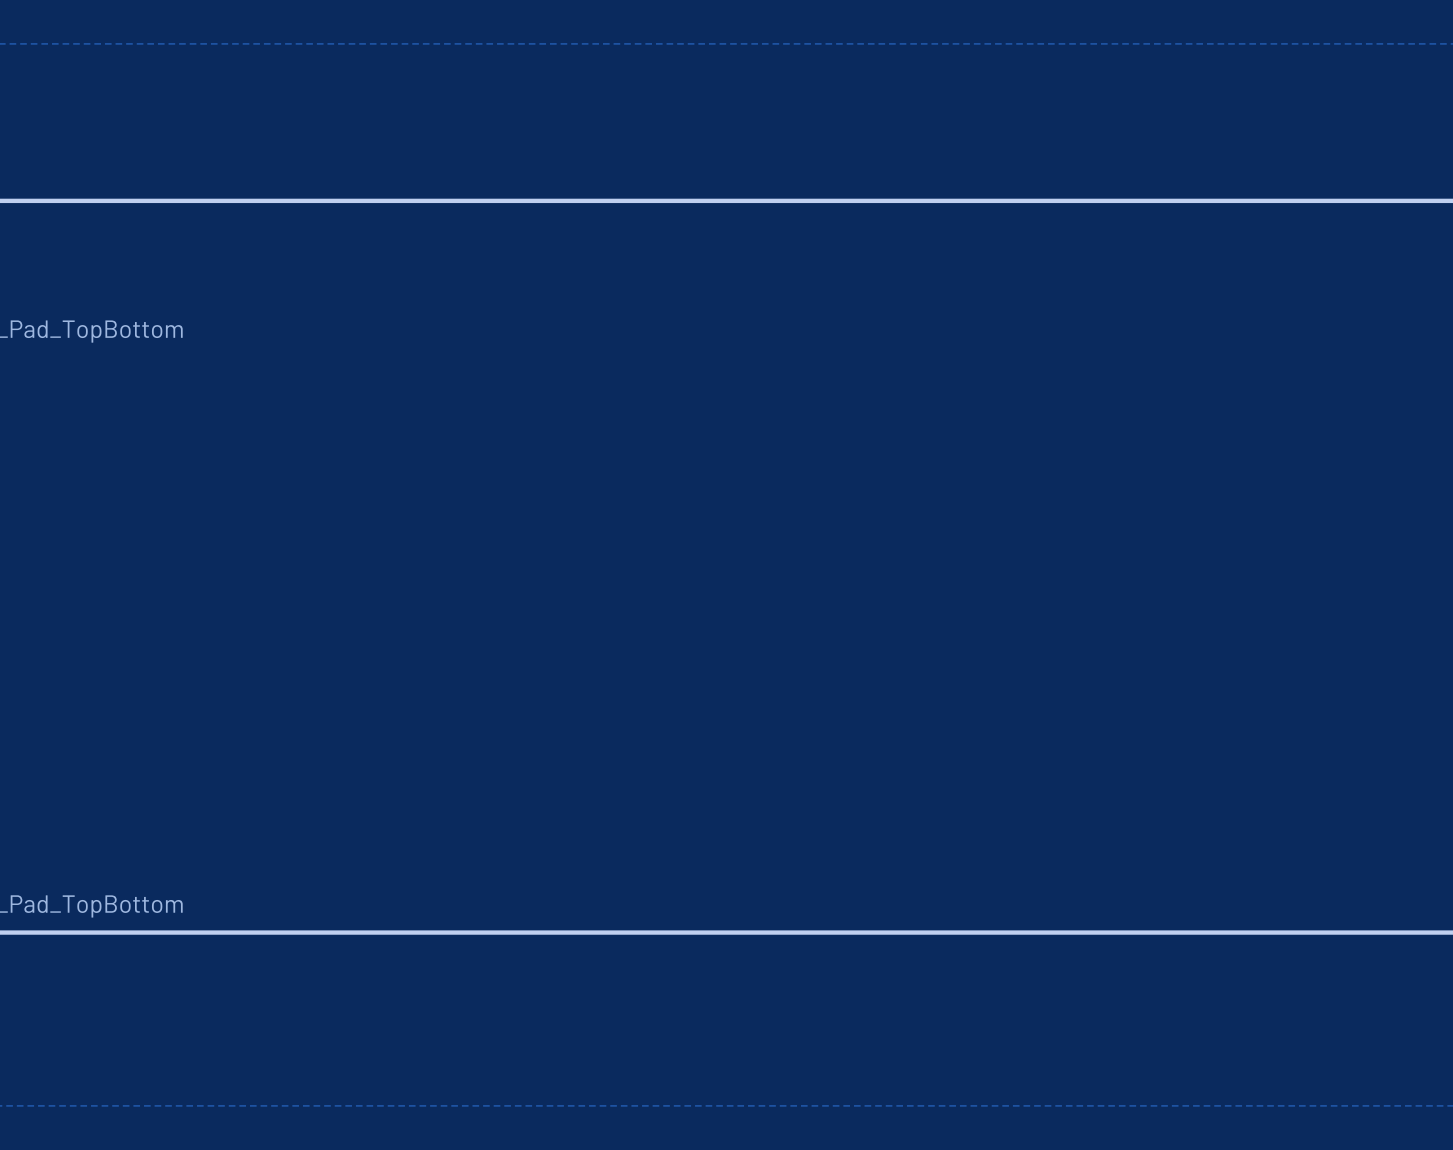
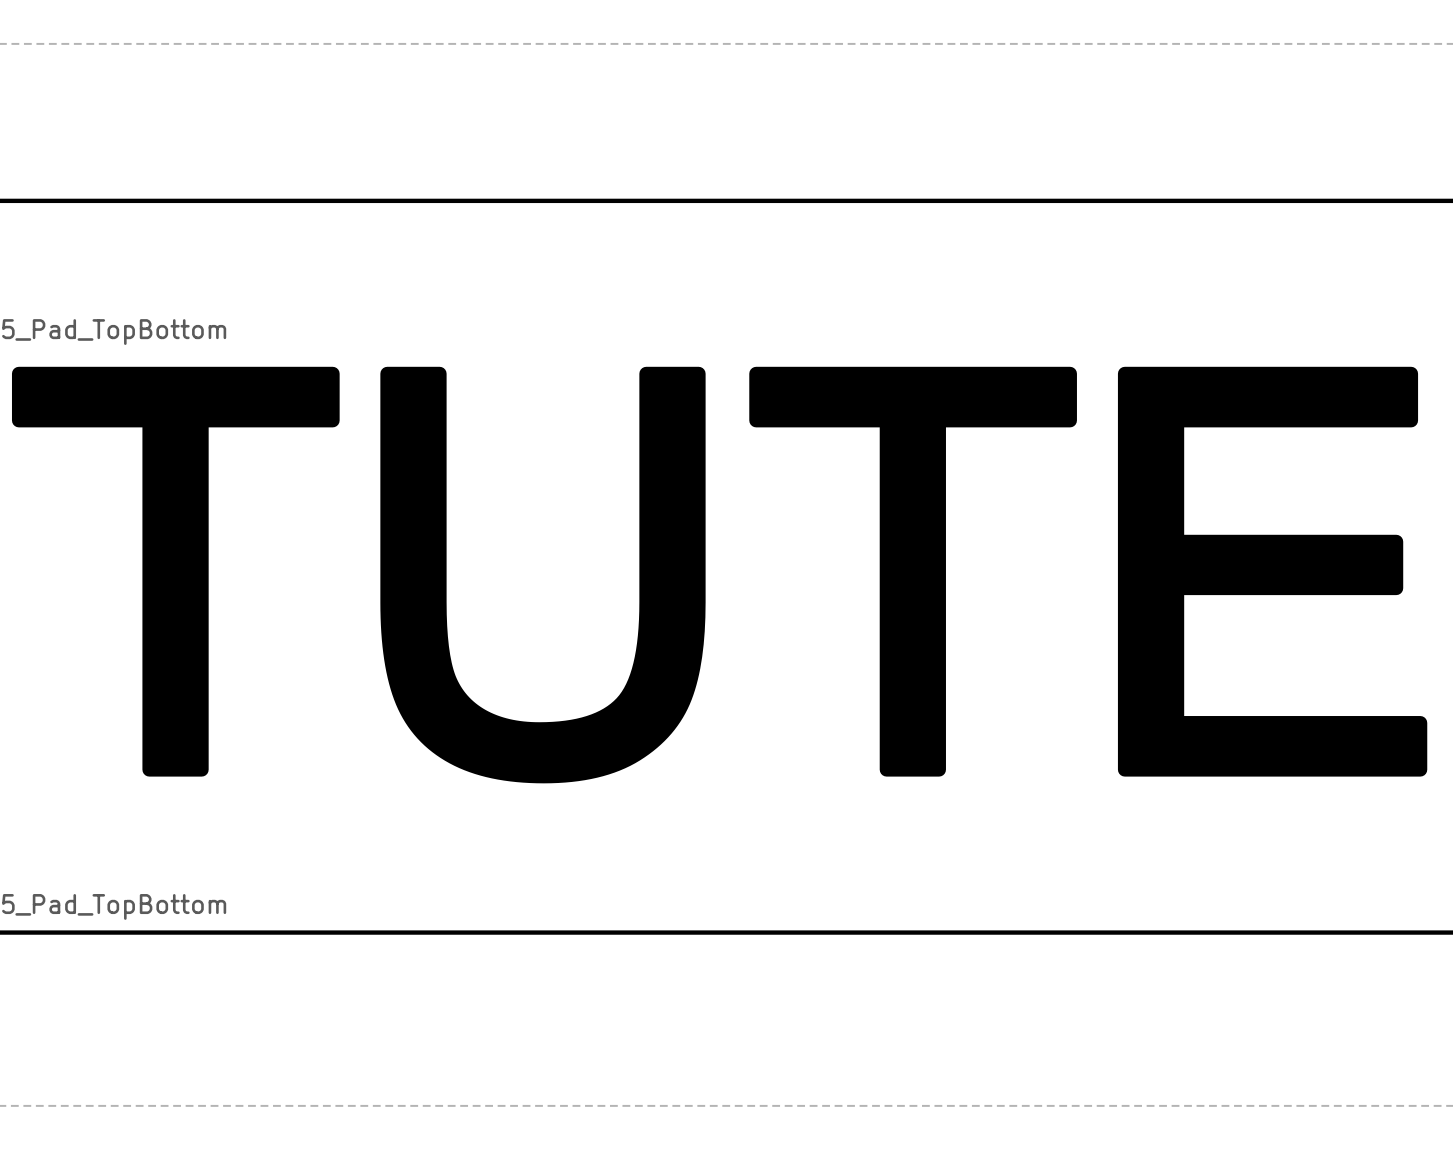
drawing: none -> [11, 366, 340, 777]
drawing: none -> [380, 366, 706, 784]
drawing: none -> [749, 366, 1077, 777]
drawing: none -> [1117, 366, 1428, 777]

